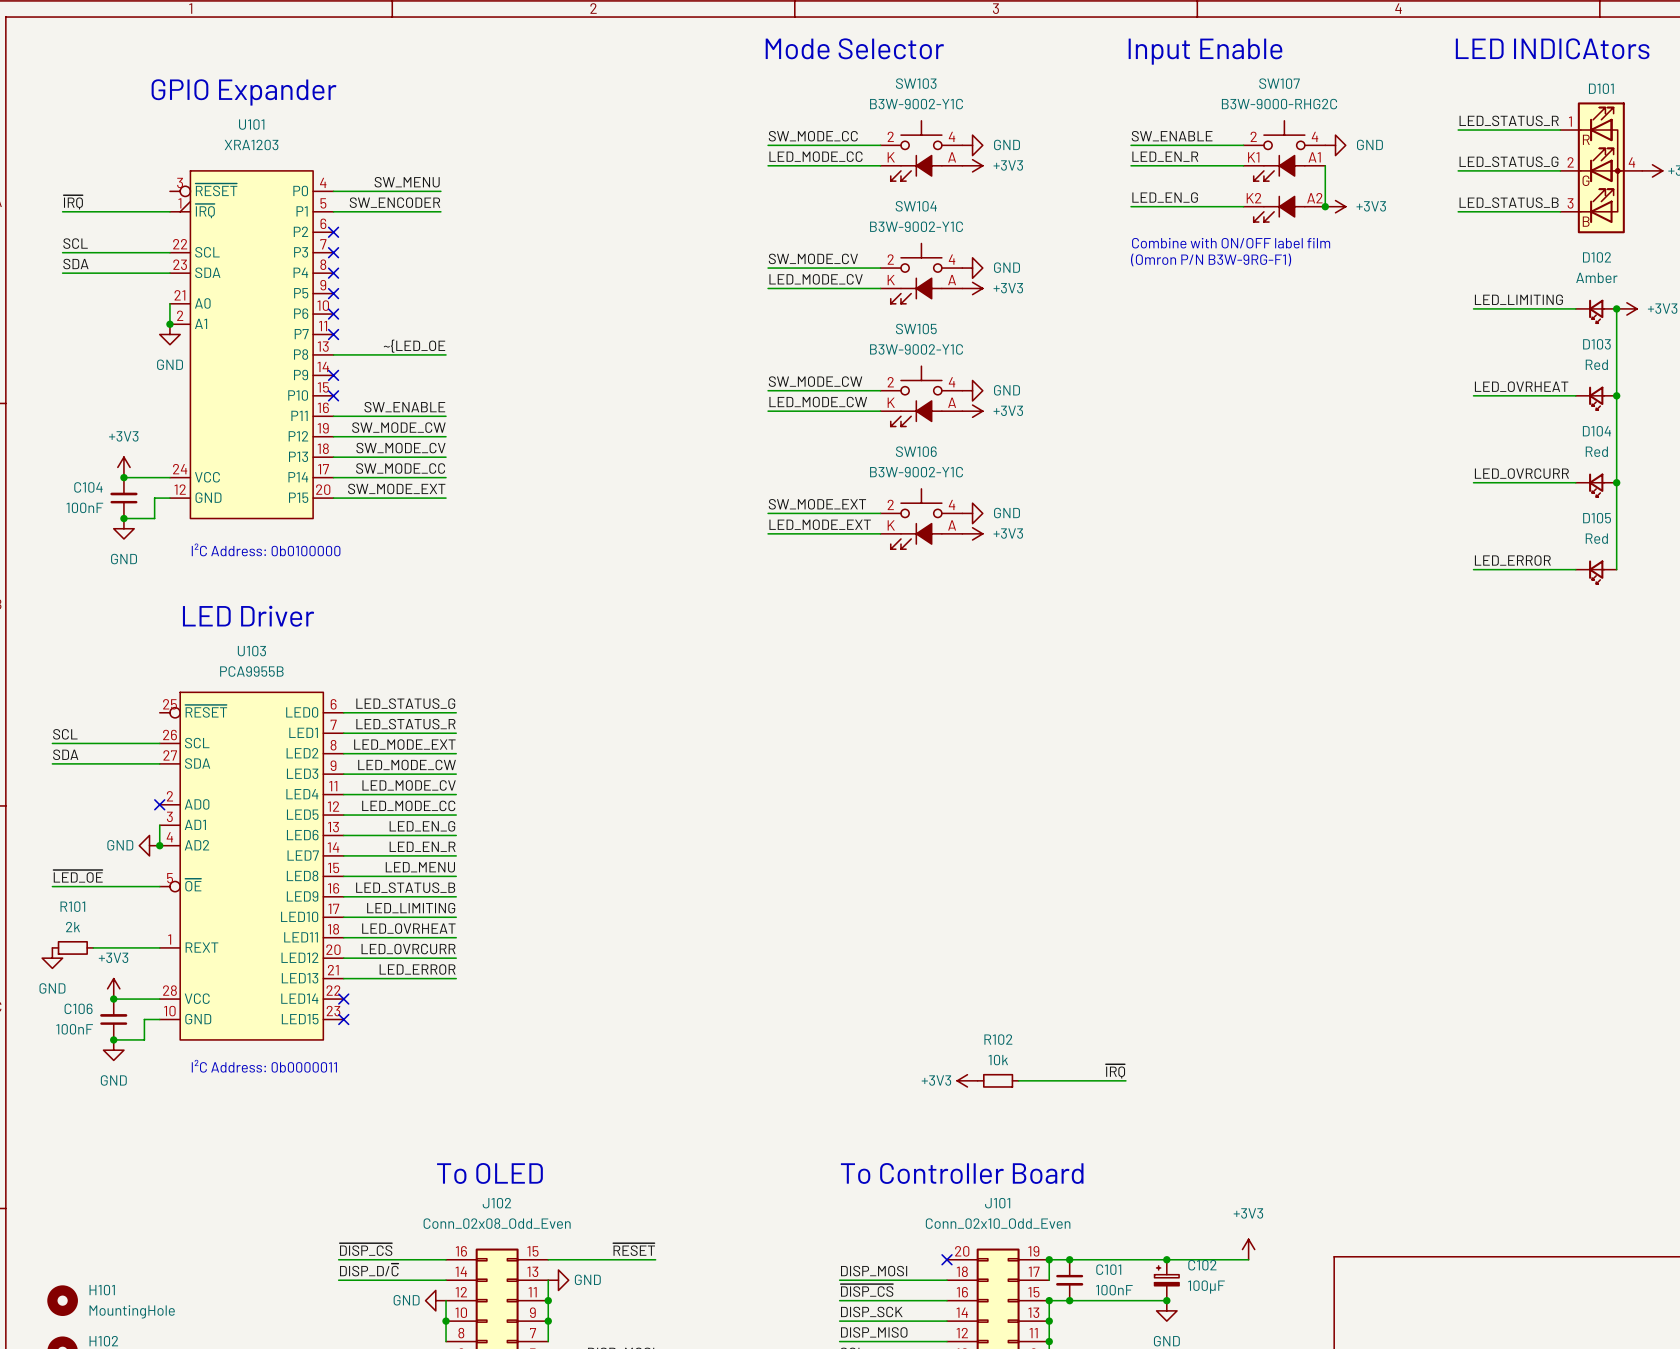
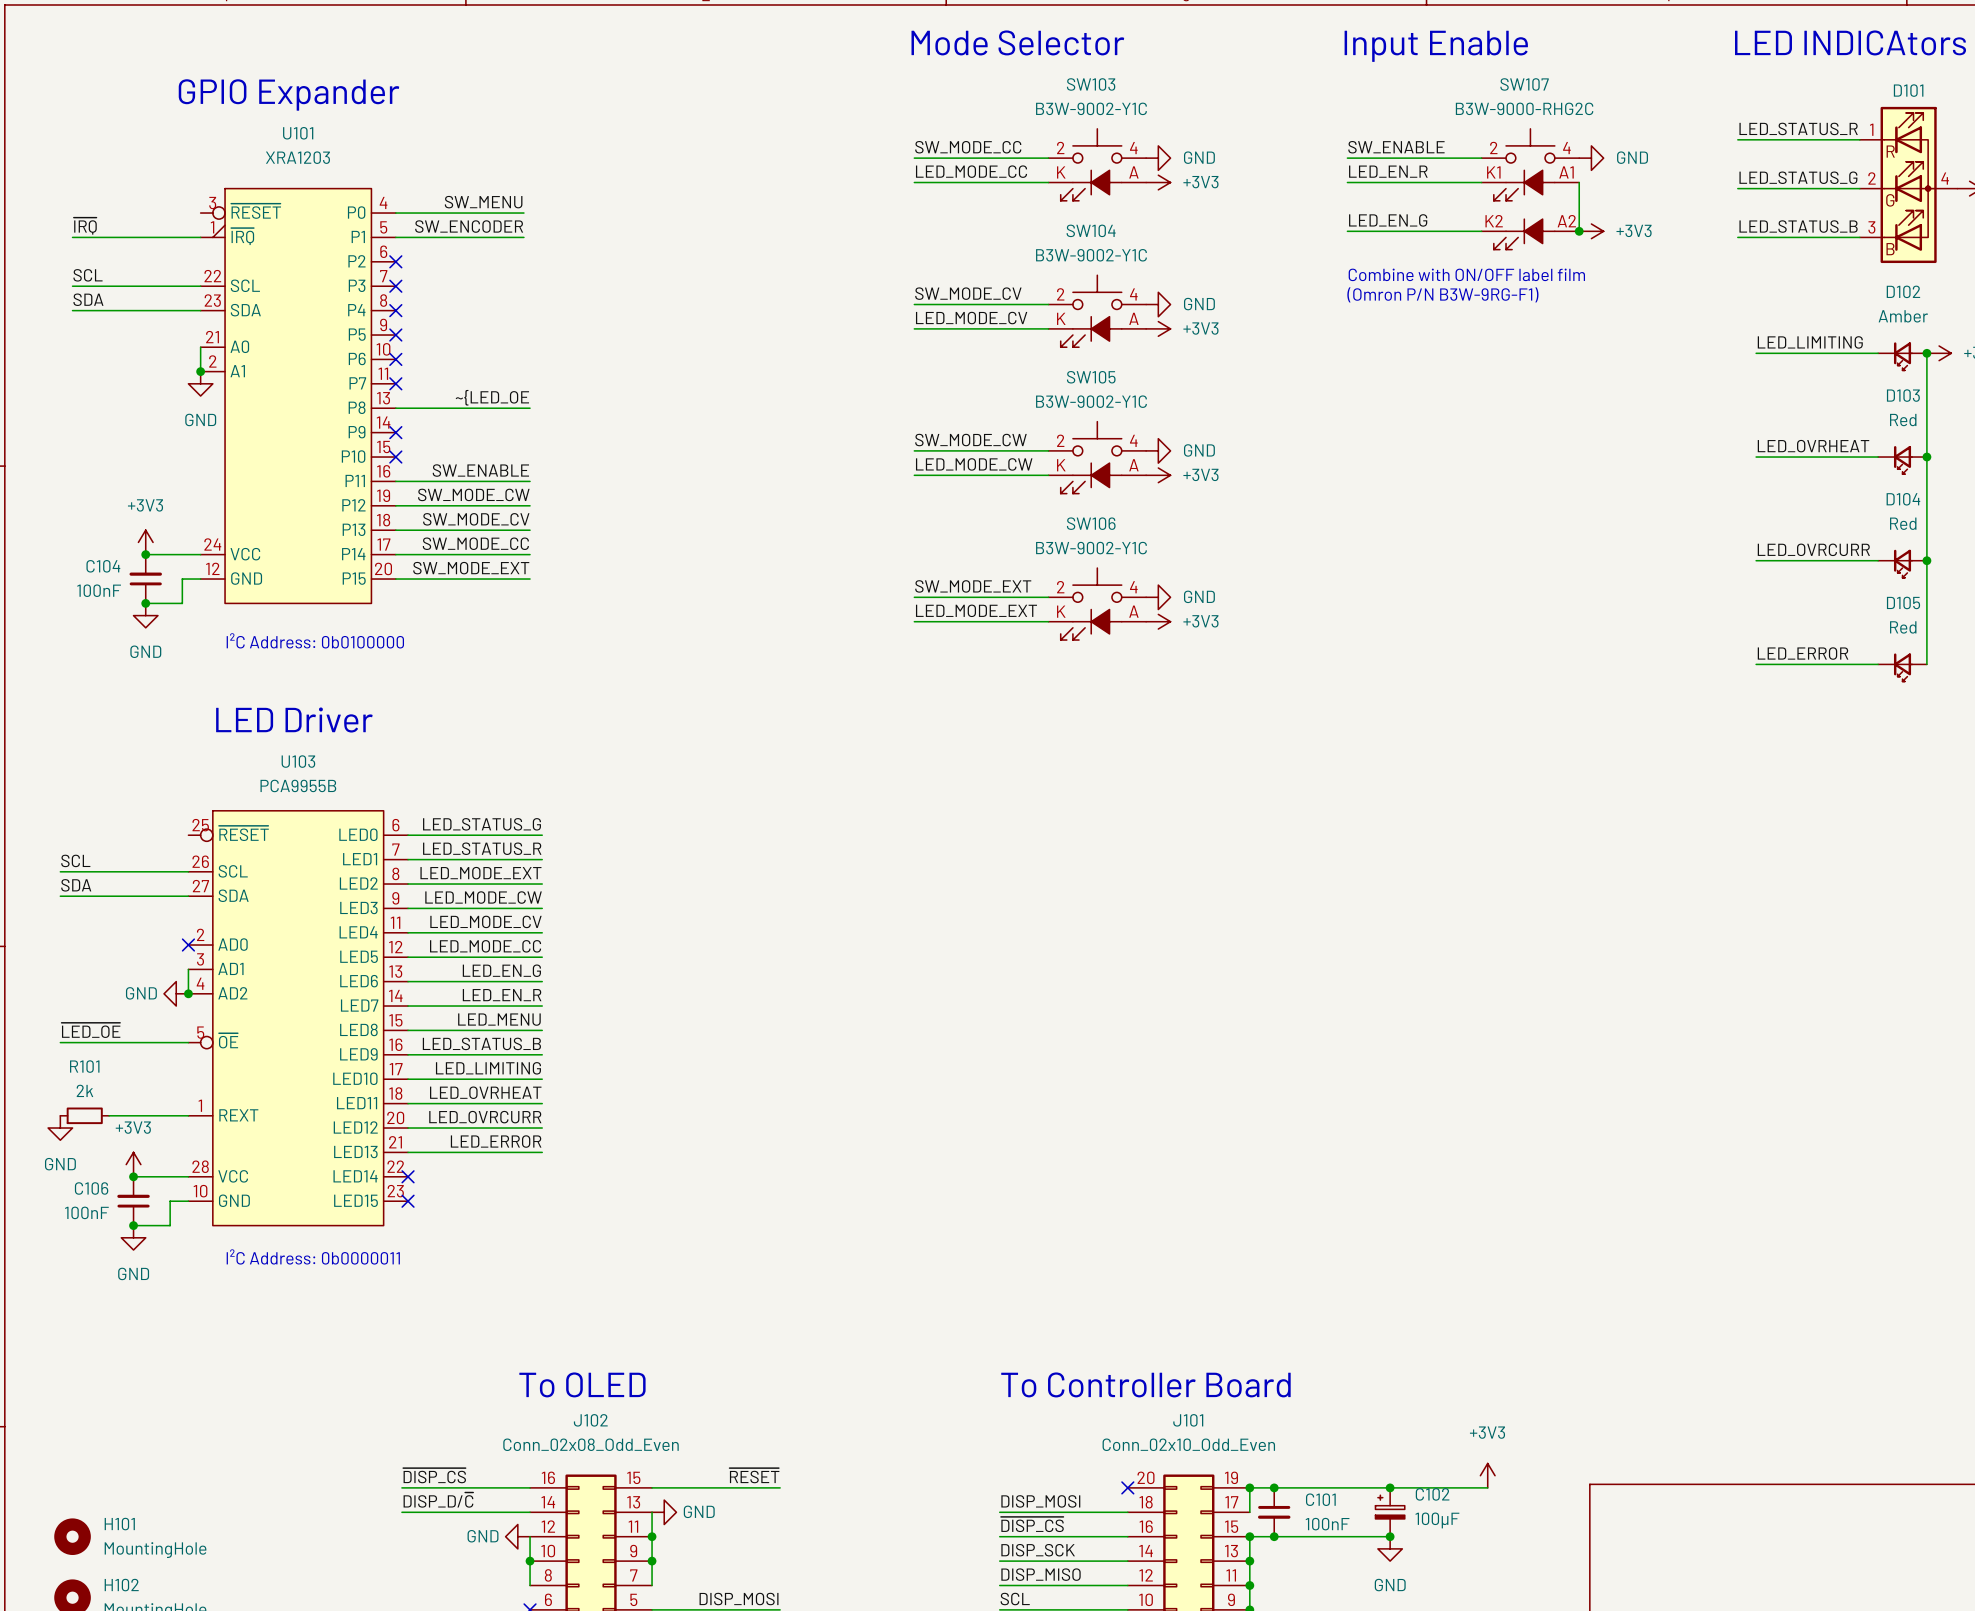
label: ~{IRQ} (1115, 1071) -> none
power symbol: +3V3 (967, 1080) -> none
R102: 10k (998, 1080) -> none
wire: (1018, 1080) (1125, 1080) -> none

